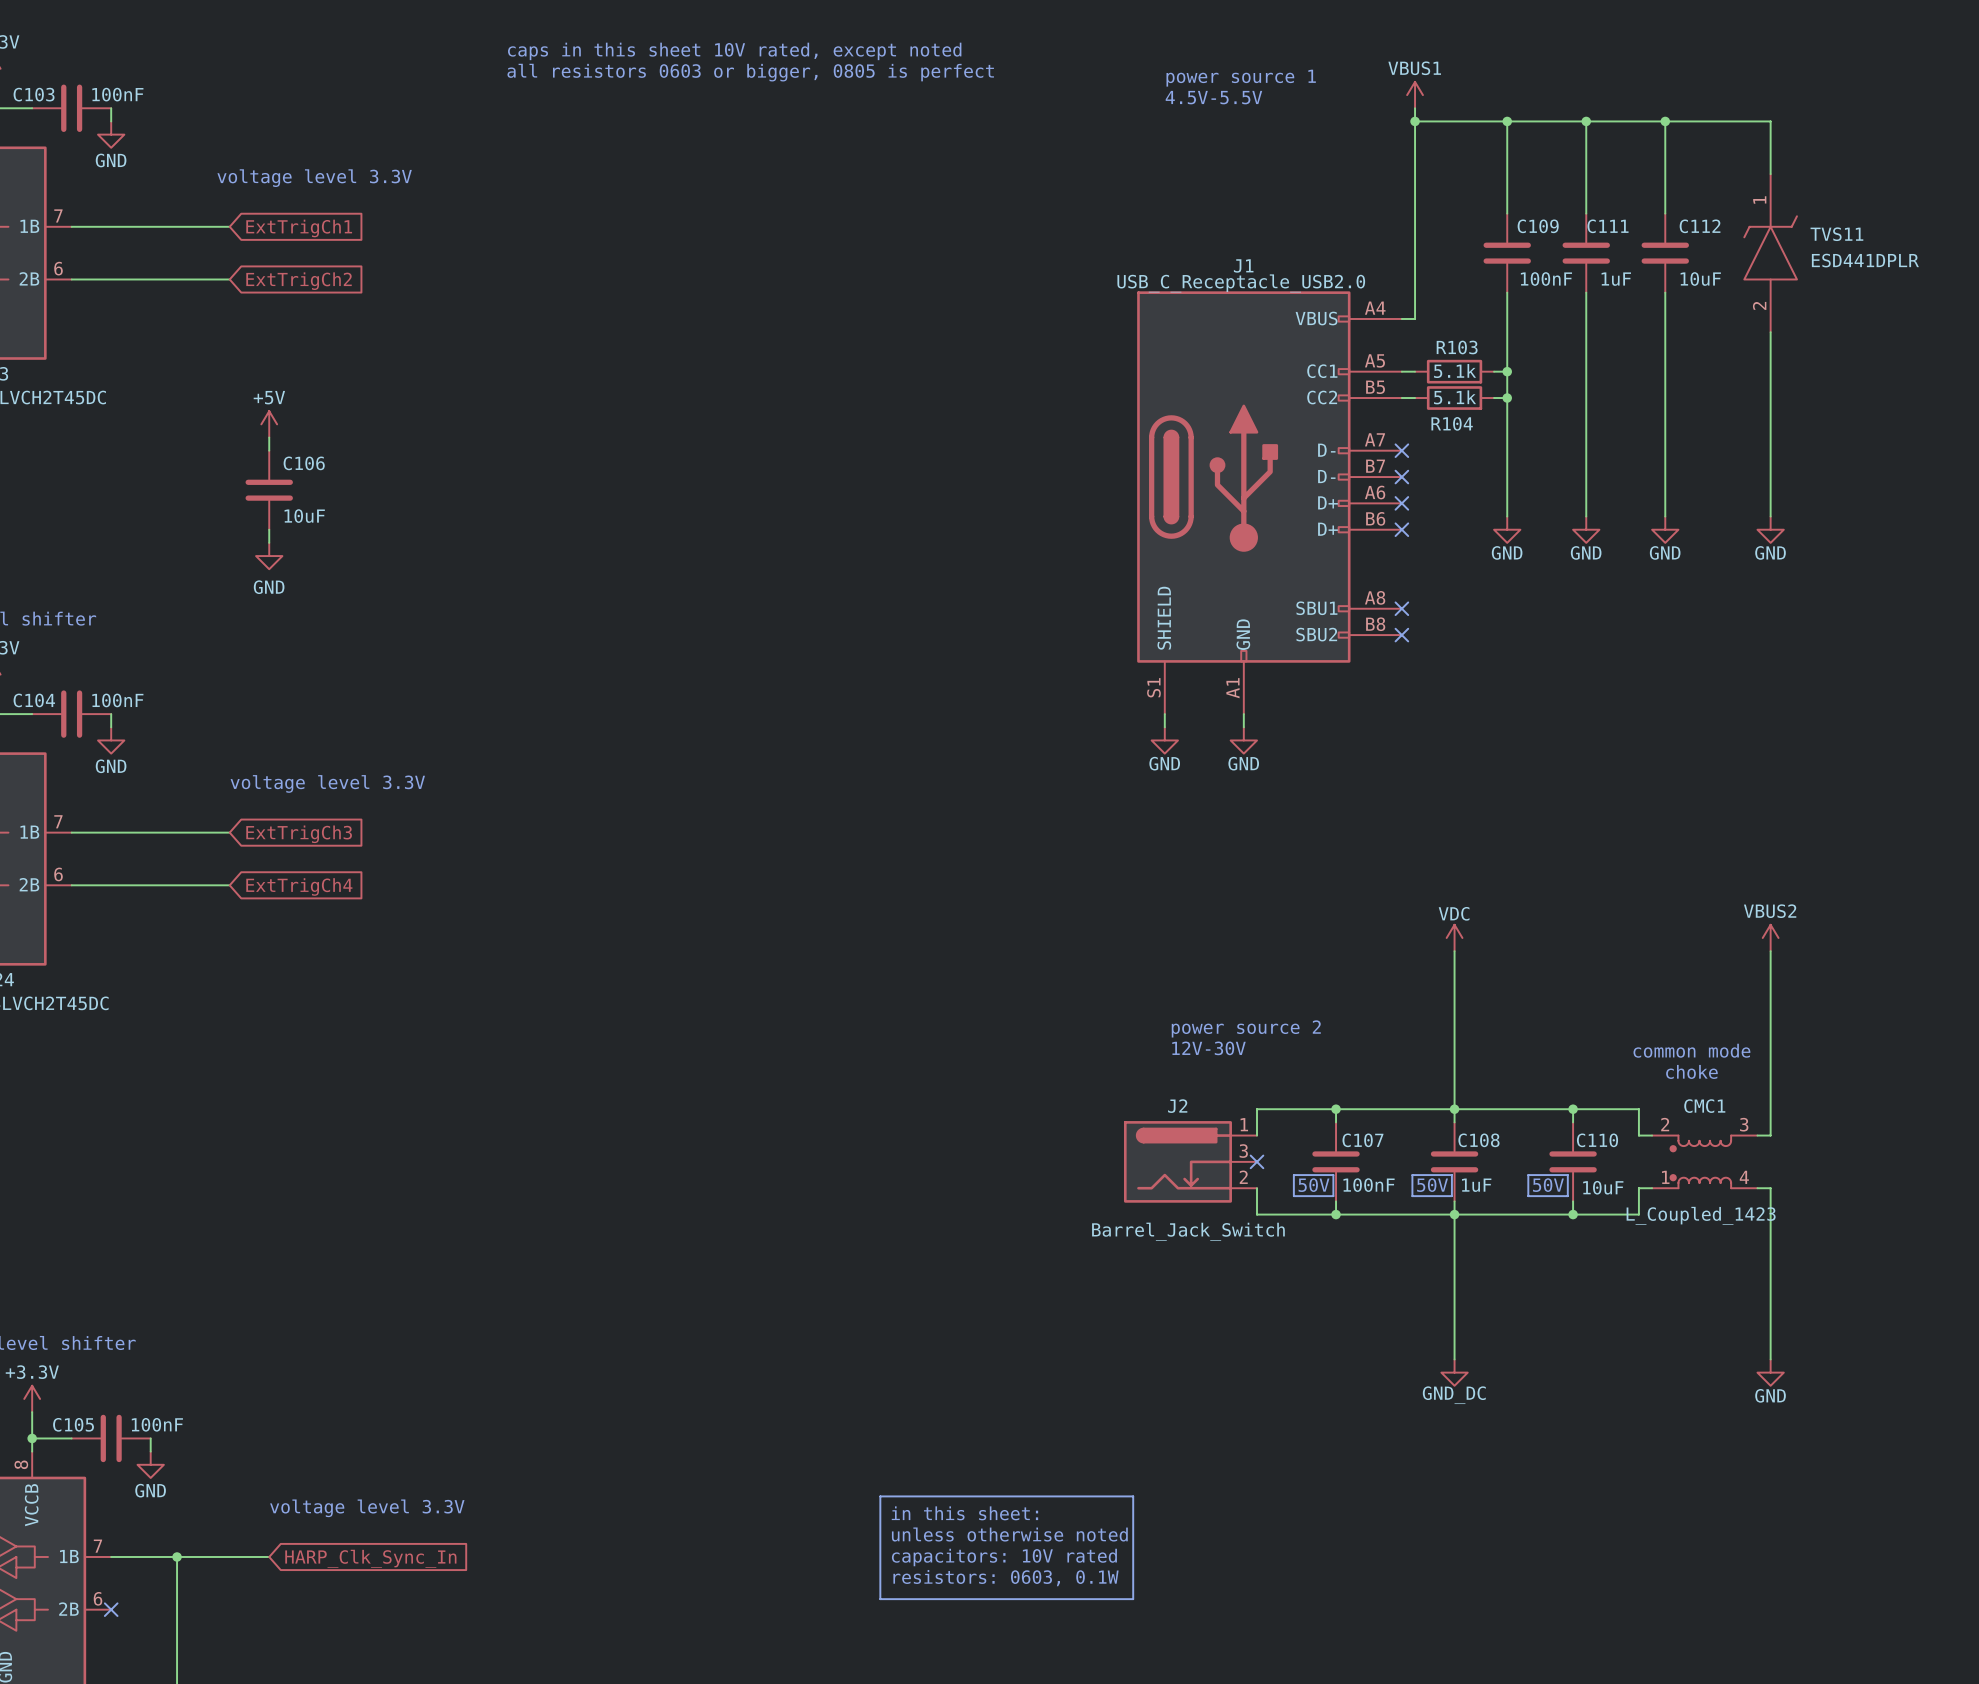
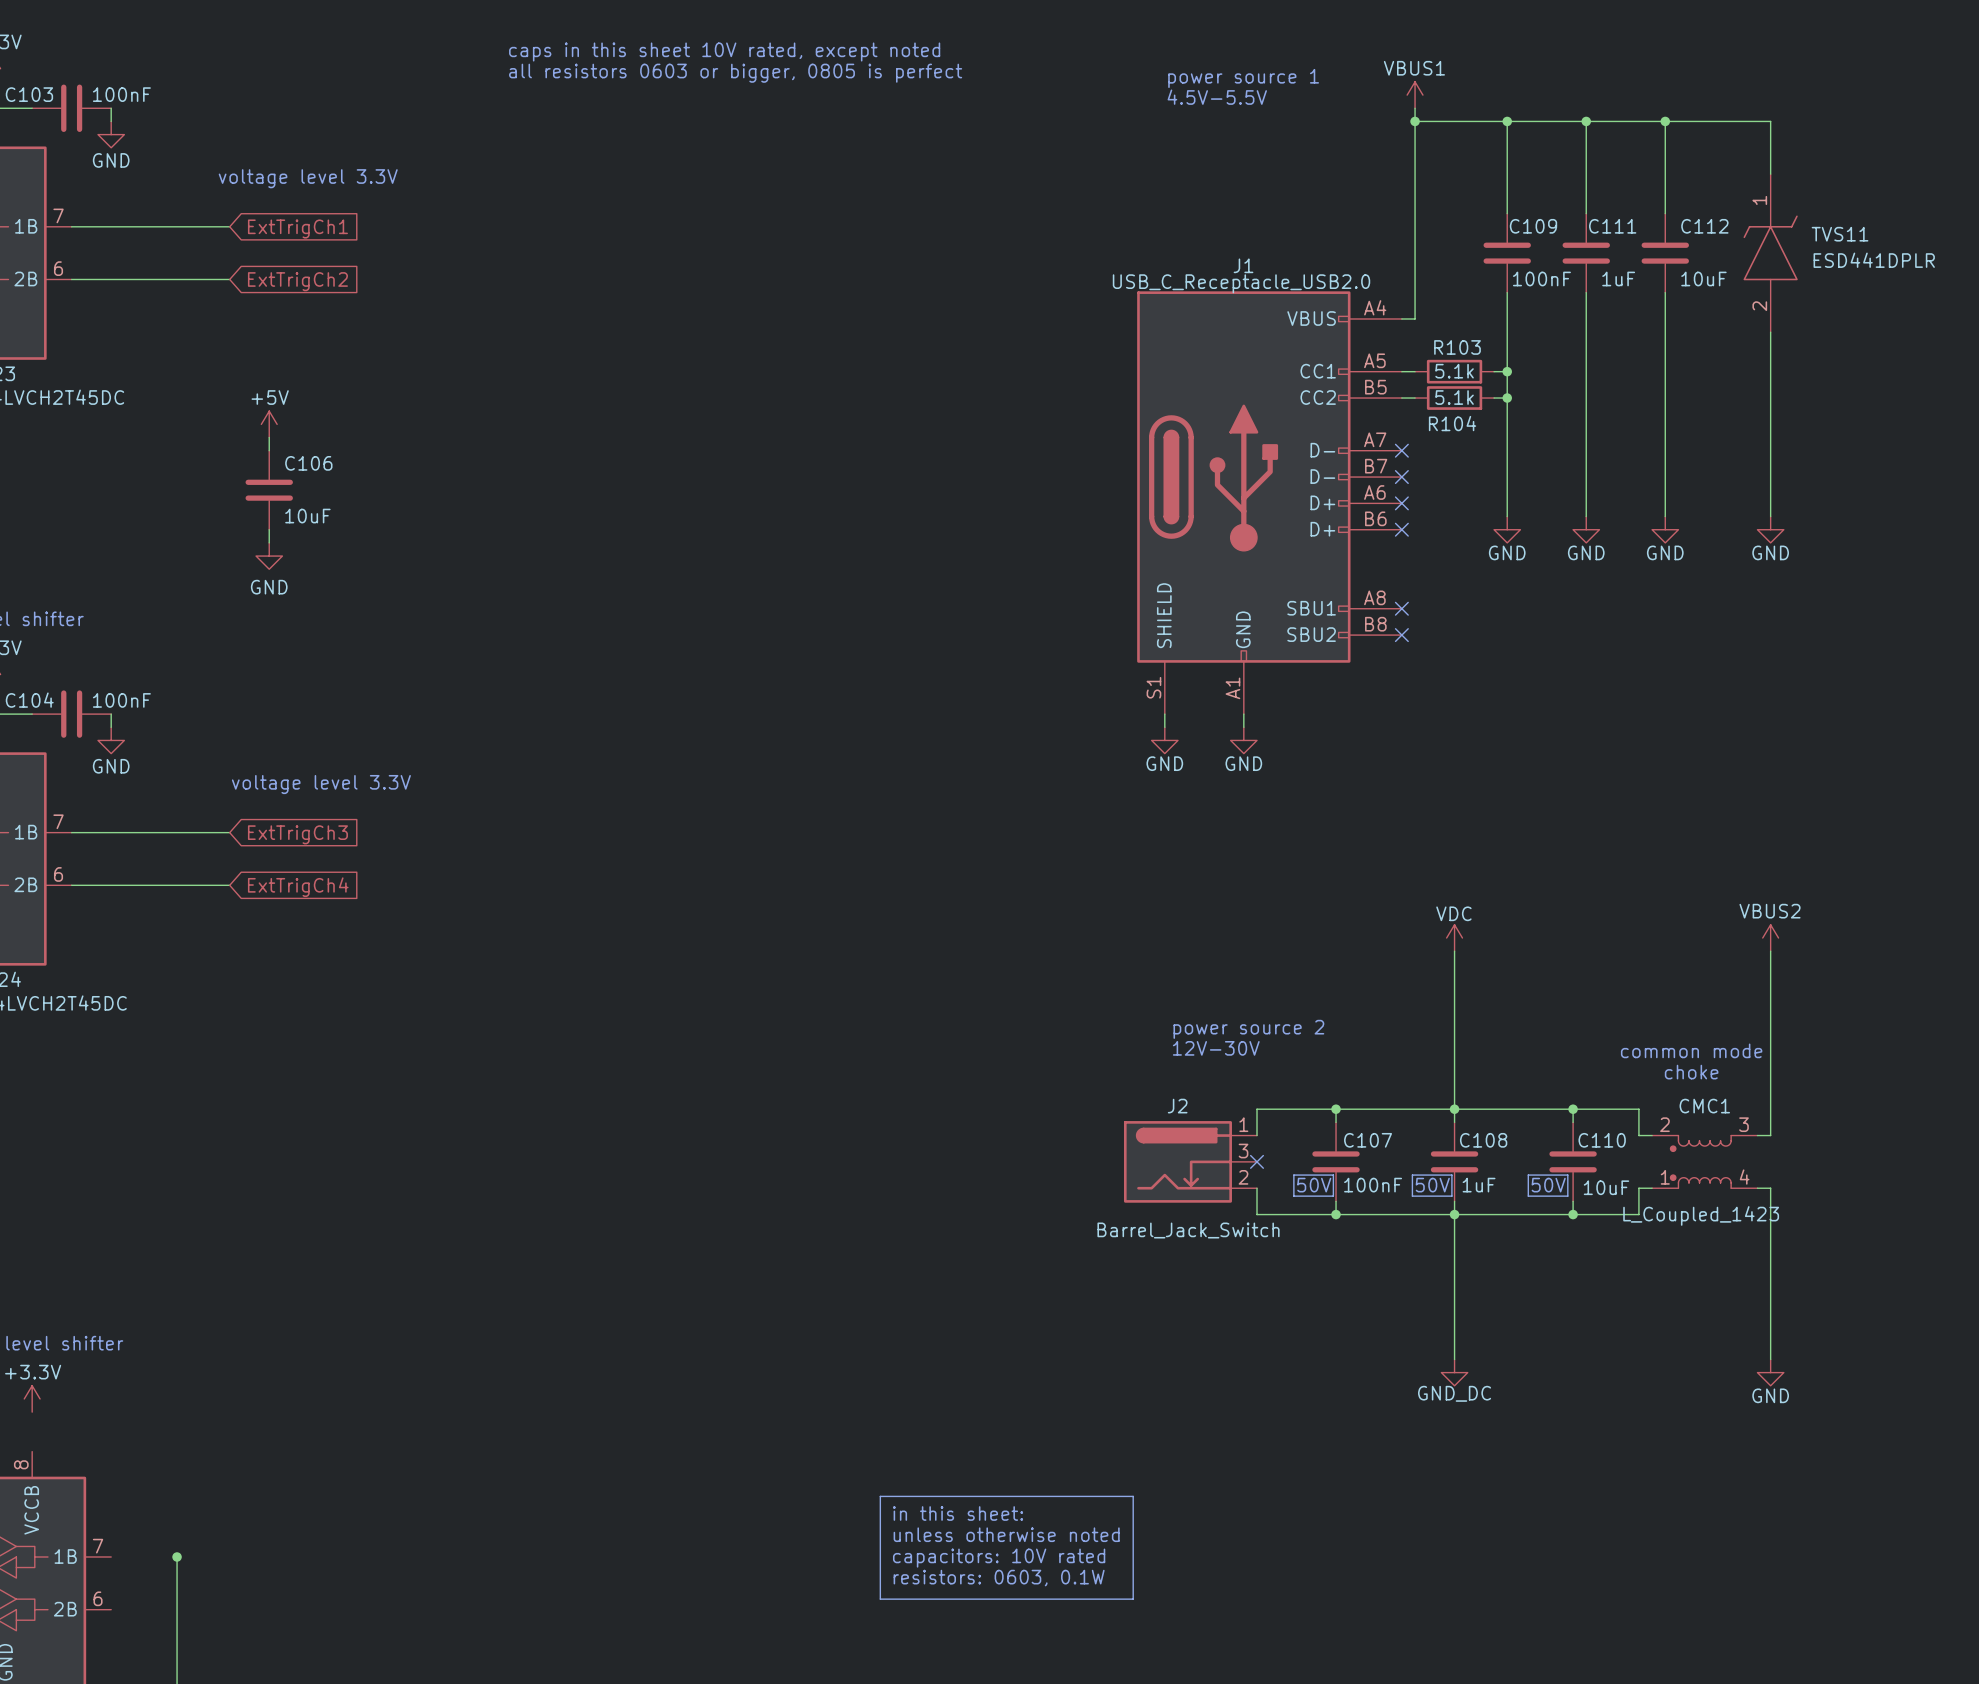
wire: (32, 1412) (32, 1451) -> none
wire: (32, 1438) (71, 1438) -> none
junction: (32, 1438) -> none
C105: 100nF (111, 1438) -> none
wire: (150, 1438) (150, 1451) -> none
power symbol: GND (150, 1464) -> none
text: voltage level 3.3V (367, 1508) -> none
wire: (111, 1556) (269, 1556) -> none
global label: HARP_Clk_Sync_In (370, 1558) -> none
no-connect mark: (111, 1609) -> none

